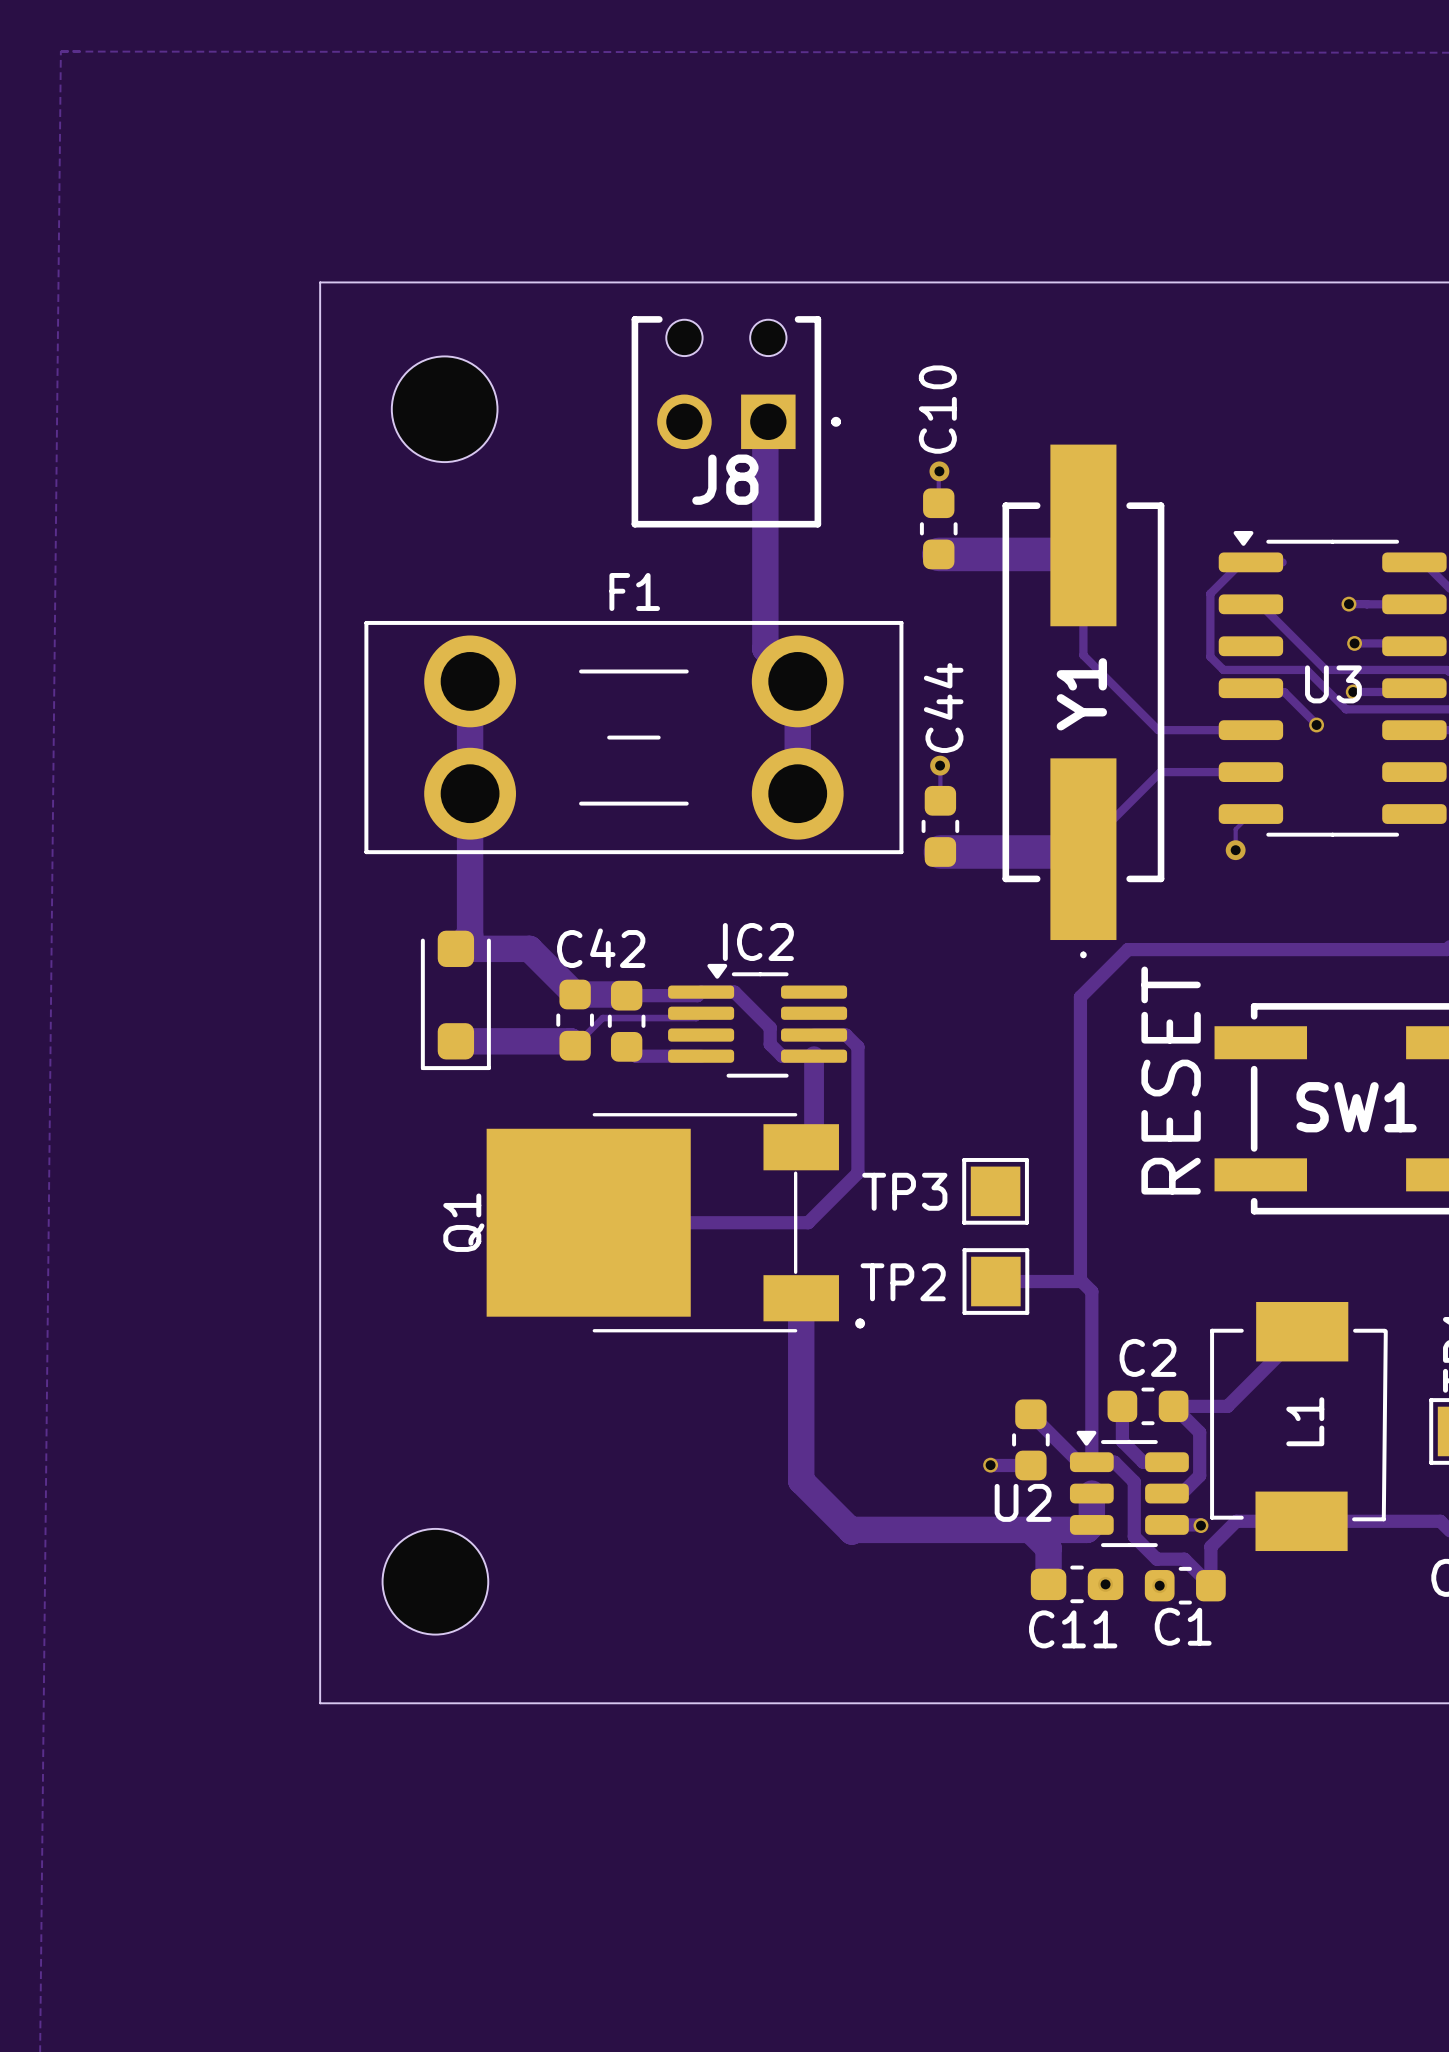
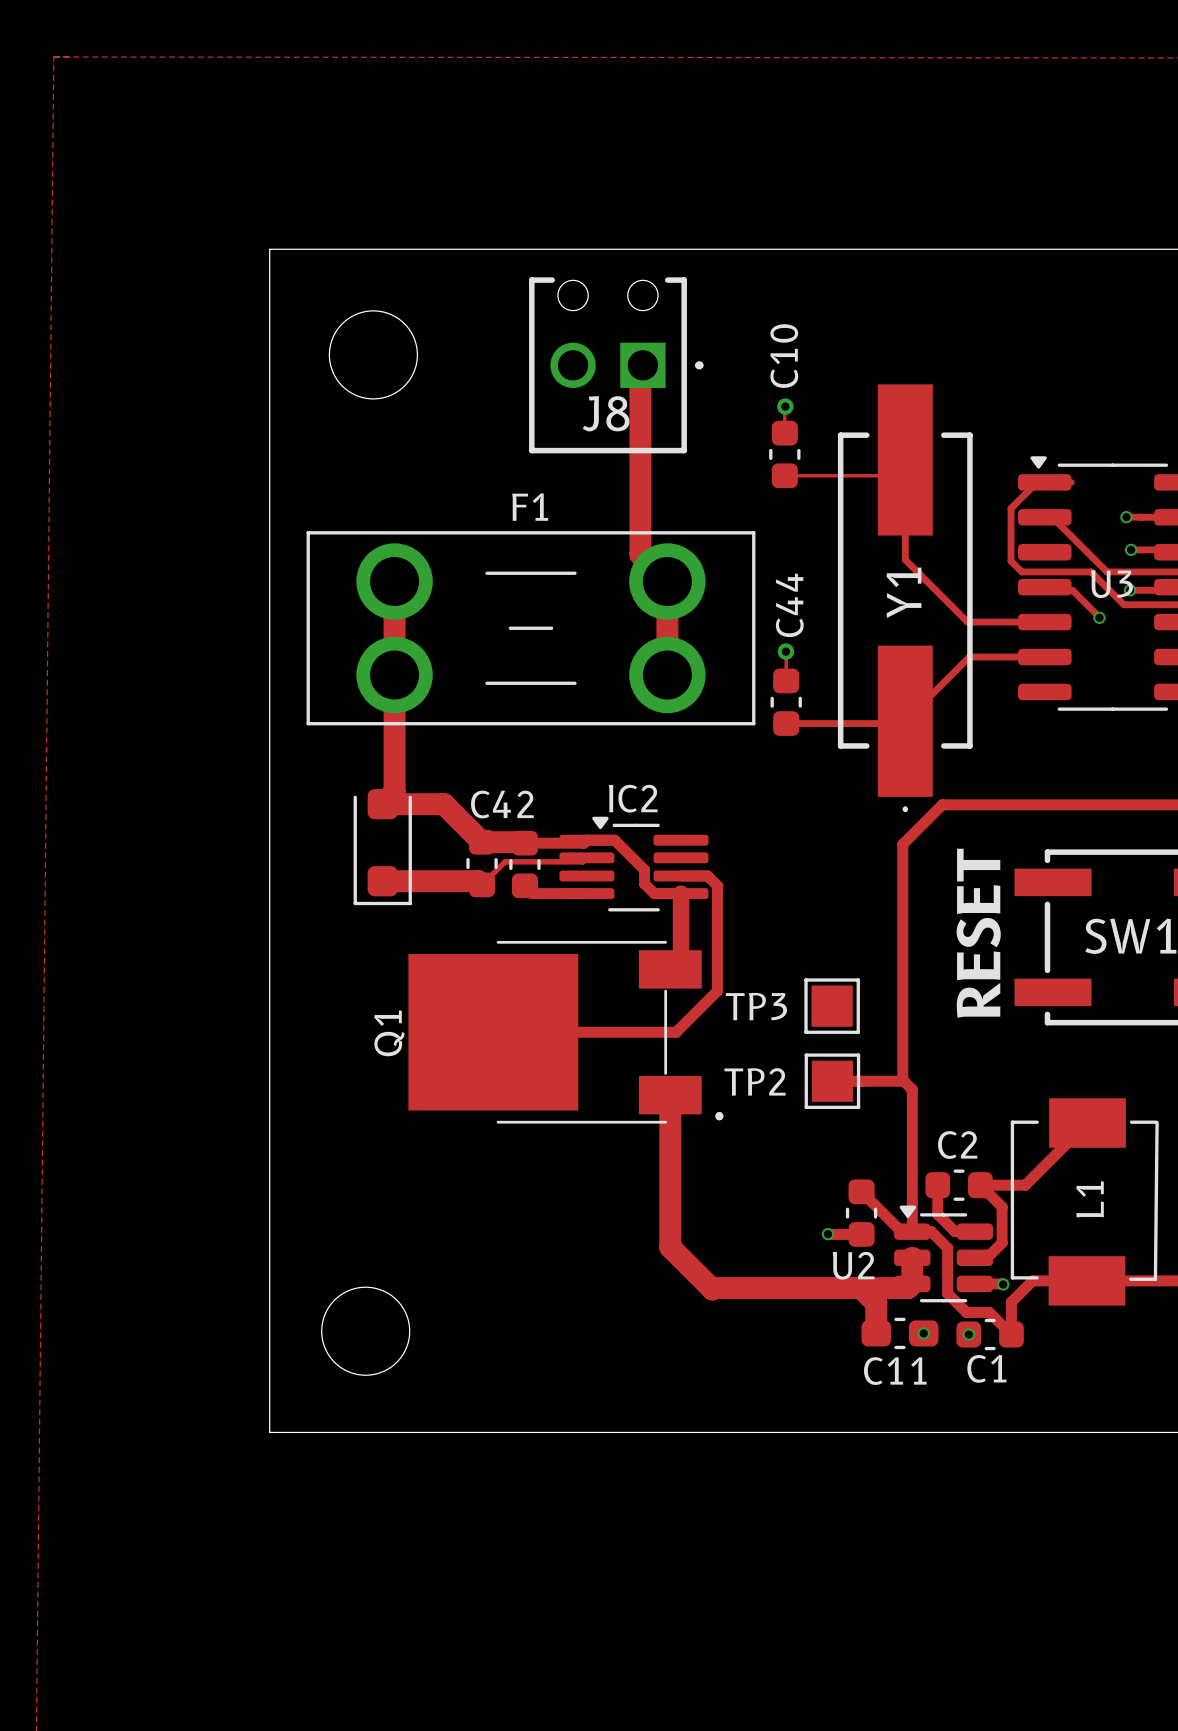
track width: thick (938, 554) (1064, 554) -> thin (784, 475) (889, 475)
track: (1250, 814) (1235, 829) (1235, 850) -> none
via: (1235, 850) -> none
track width: thick (940, 851) (1080, 851) -> thin (786, 723) (902, 723)

